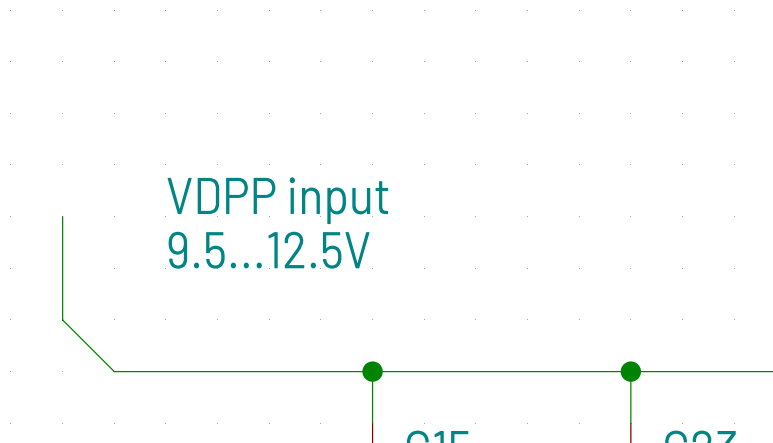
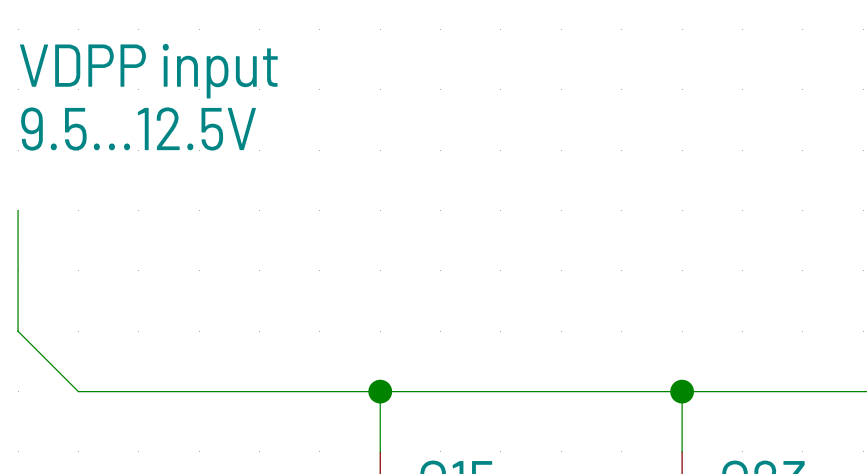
text position: VDPP input (277, 200) -> VDPP input (148, 71)
text position: 9.5...12.5V (269, 250) -> 9.5...12.5V (138, 129)

